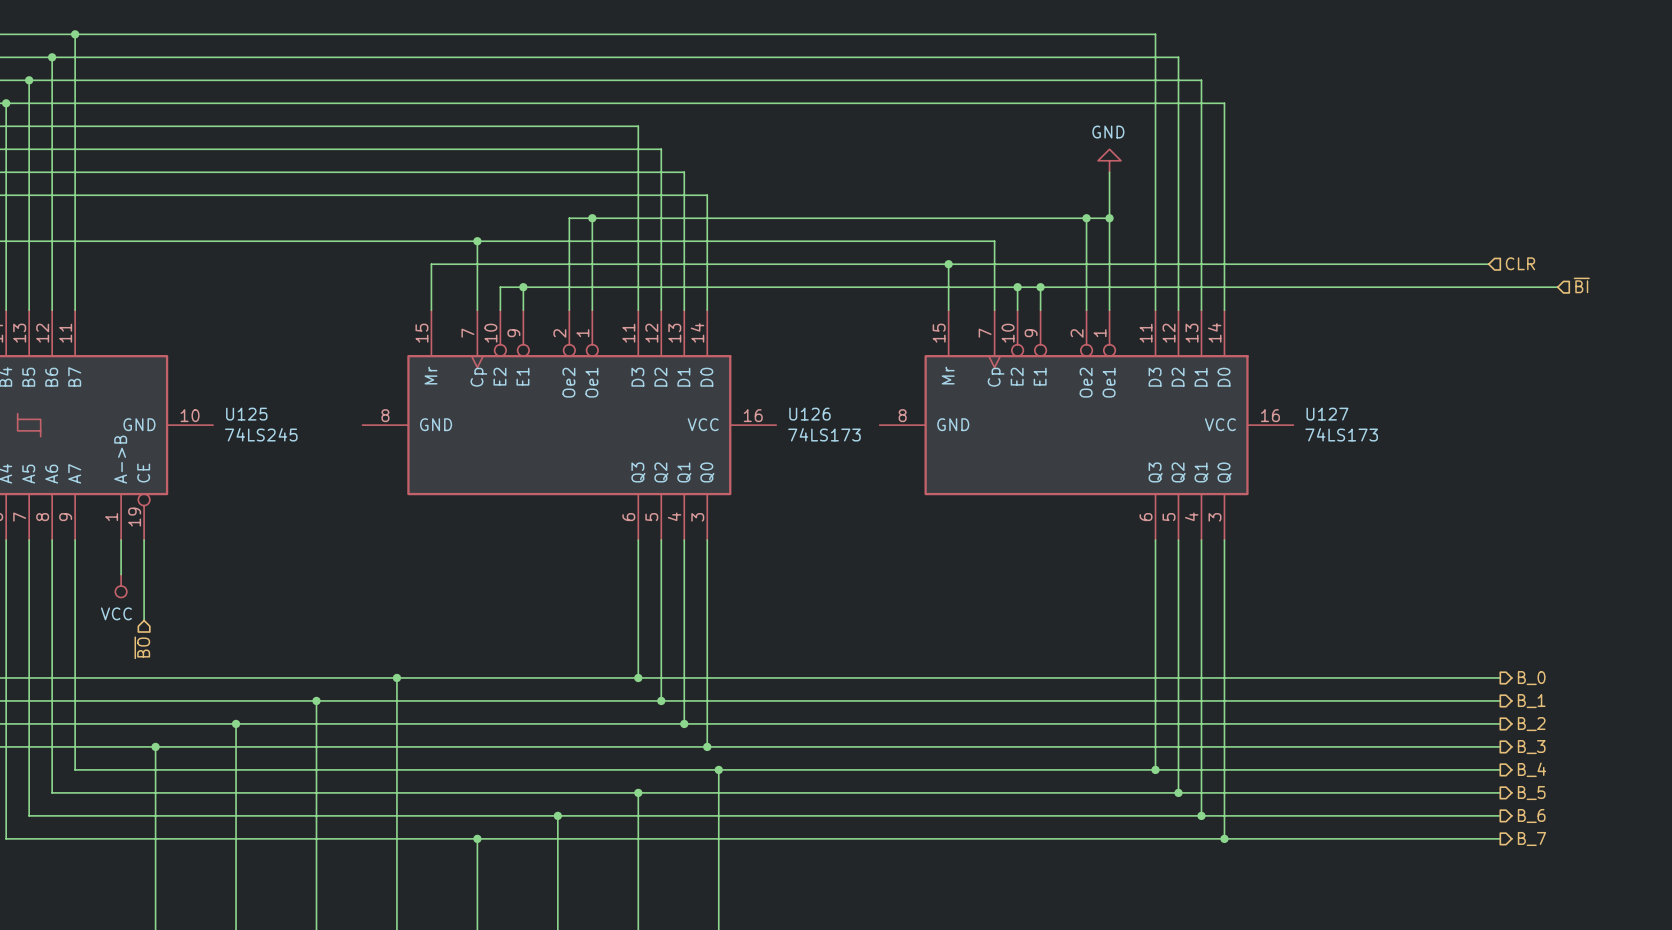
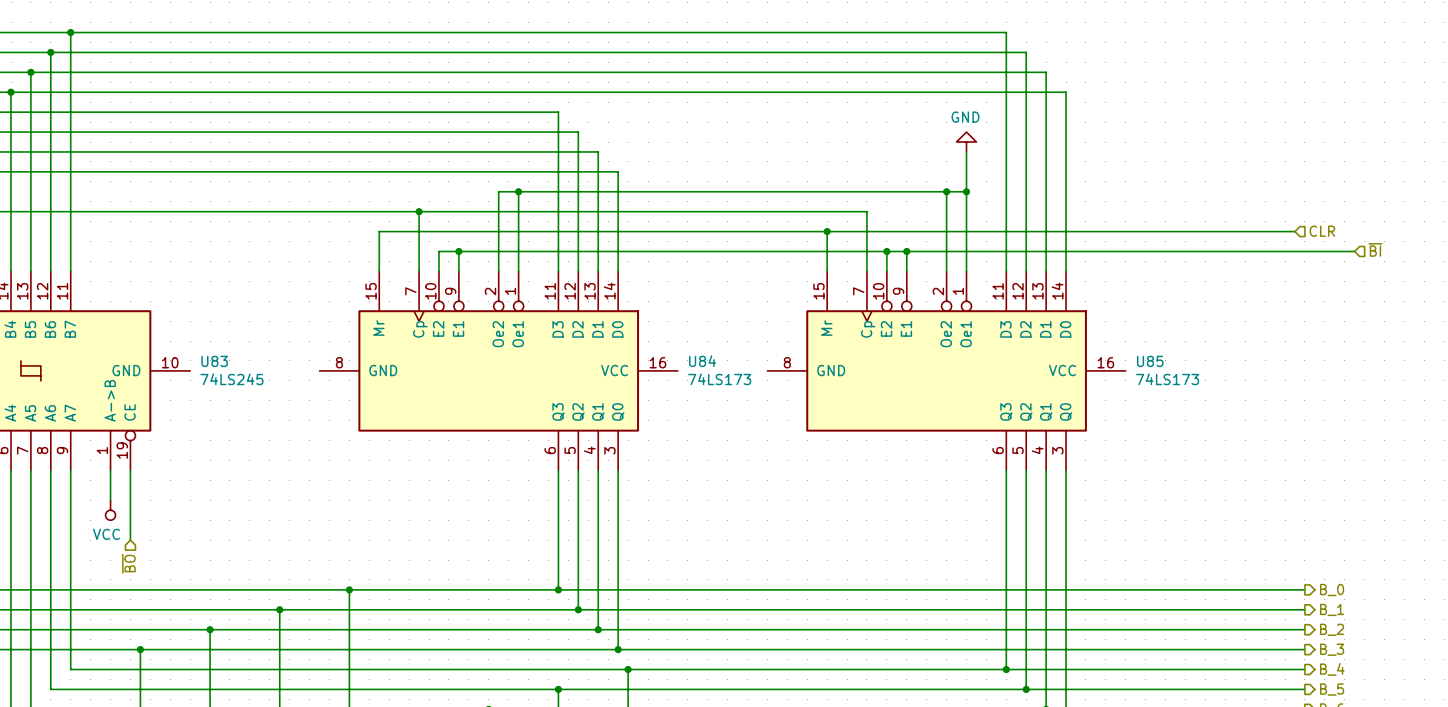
U125 name: U125 (246, 414) -> U83 (214, 361)
U126 name: U126 (809, 414) -> U84 (702, 361)
U127 name: U127 (1327, 414) -> U85 (1150, 361)

